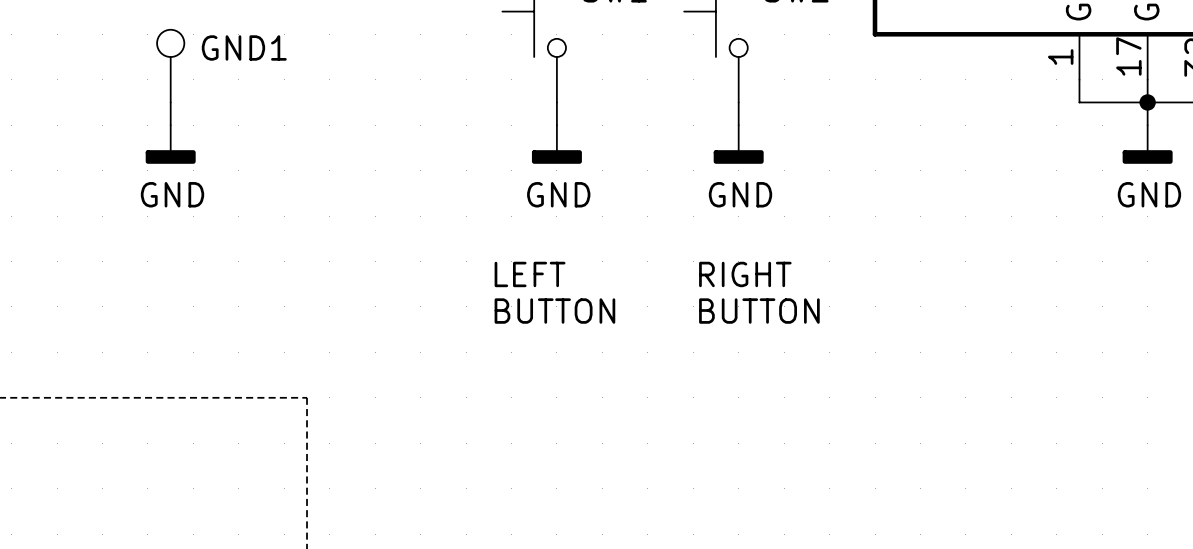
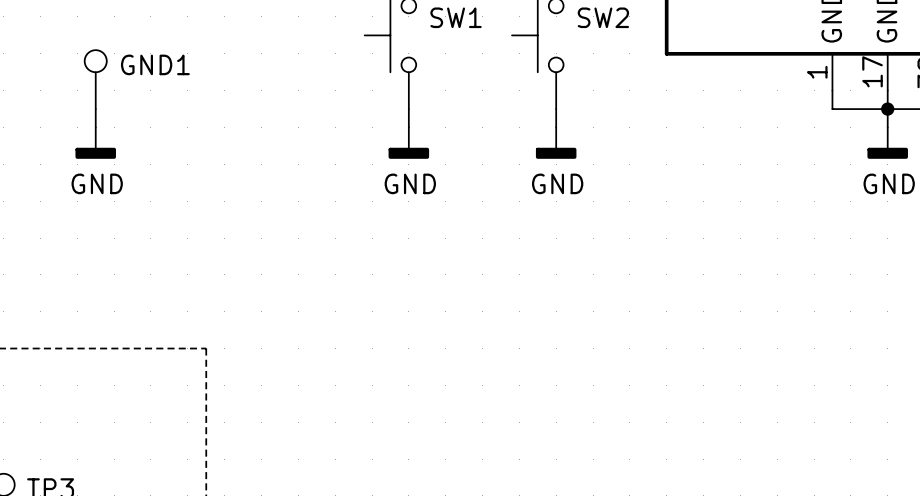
text: LEFT (530, 274) -> none
text: RIGHT (745, 274) -> none
text: BUTTON (554, 311) -> none
text: BUTTON (759, 311) -> none

